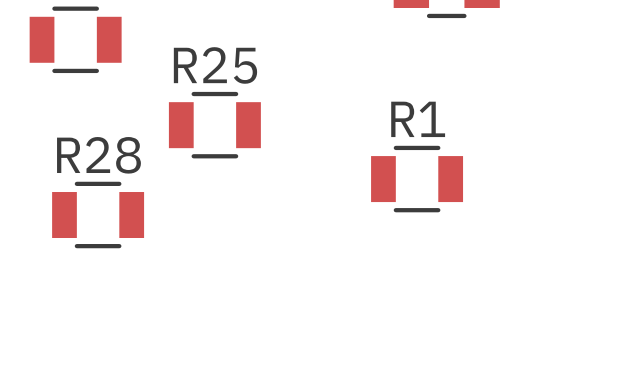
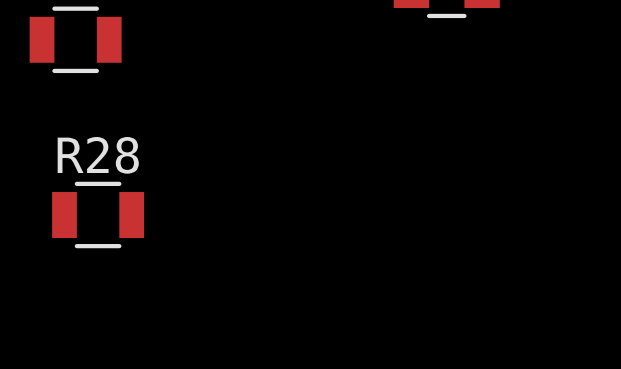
R25: (214, 125) -> none
R1: (417, 179) -> none

